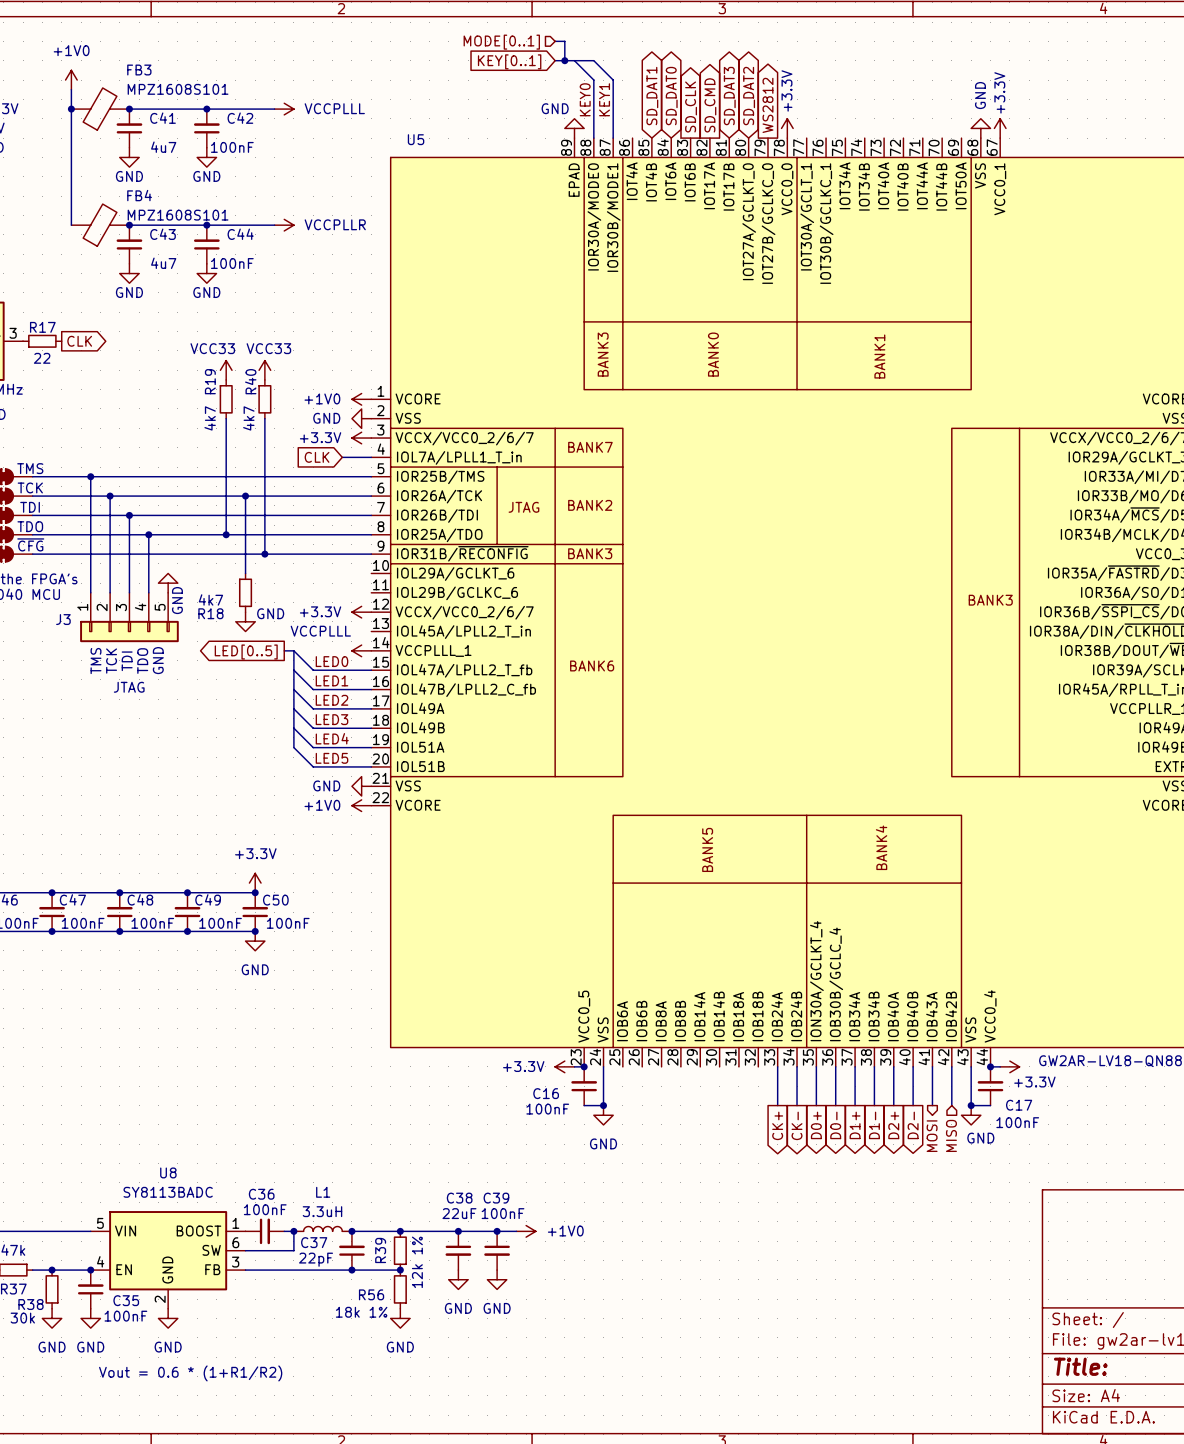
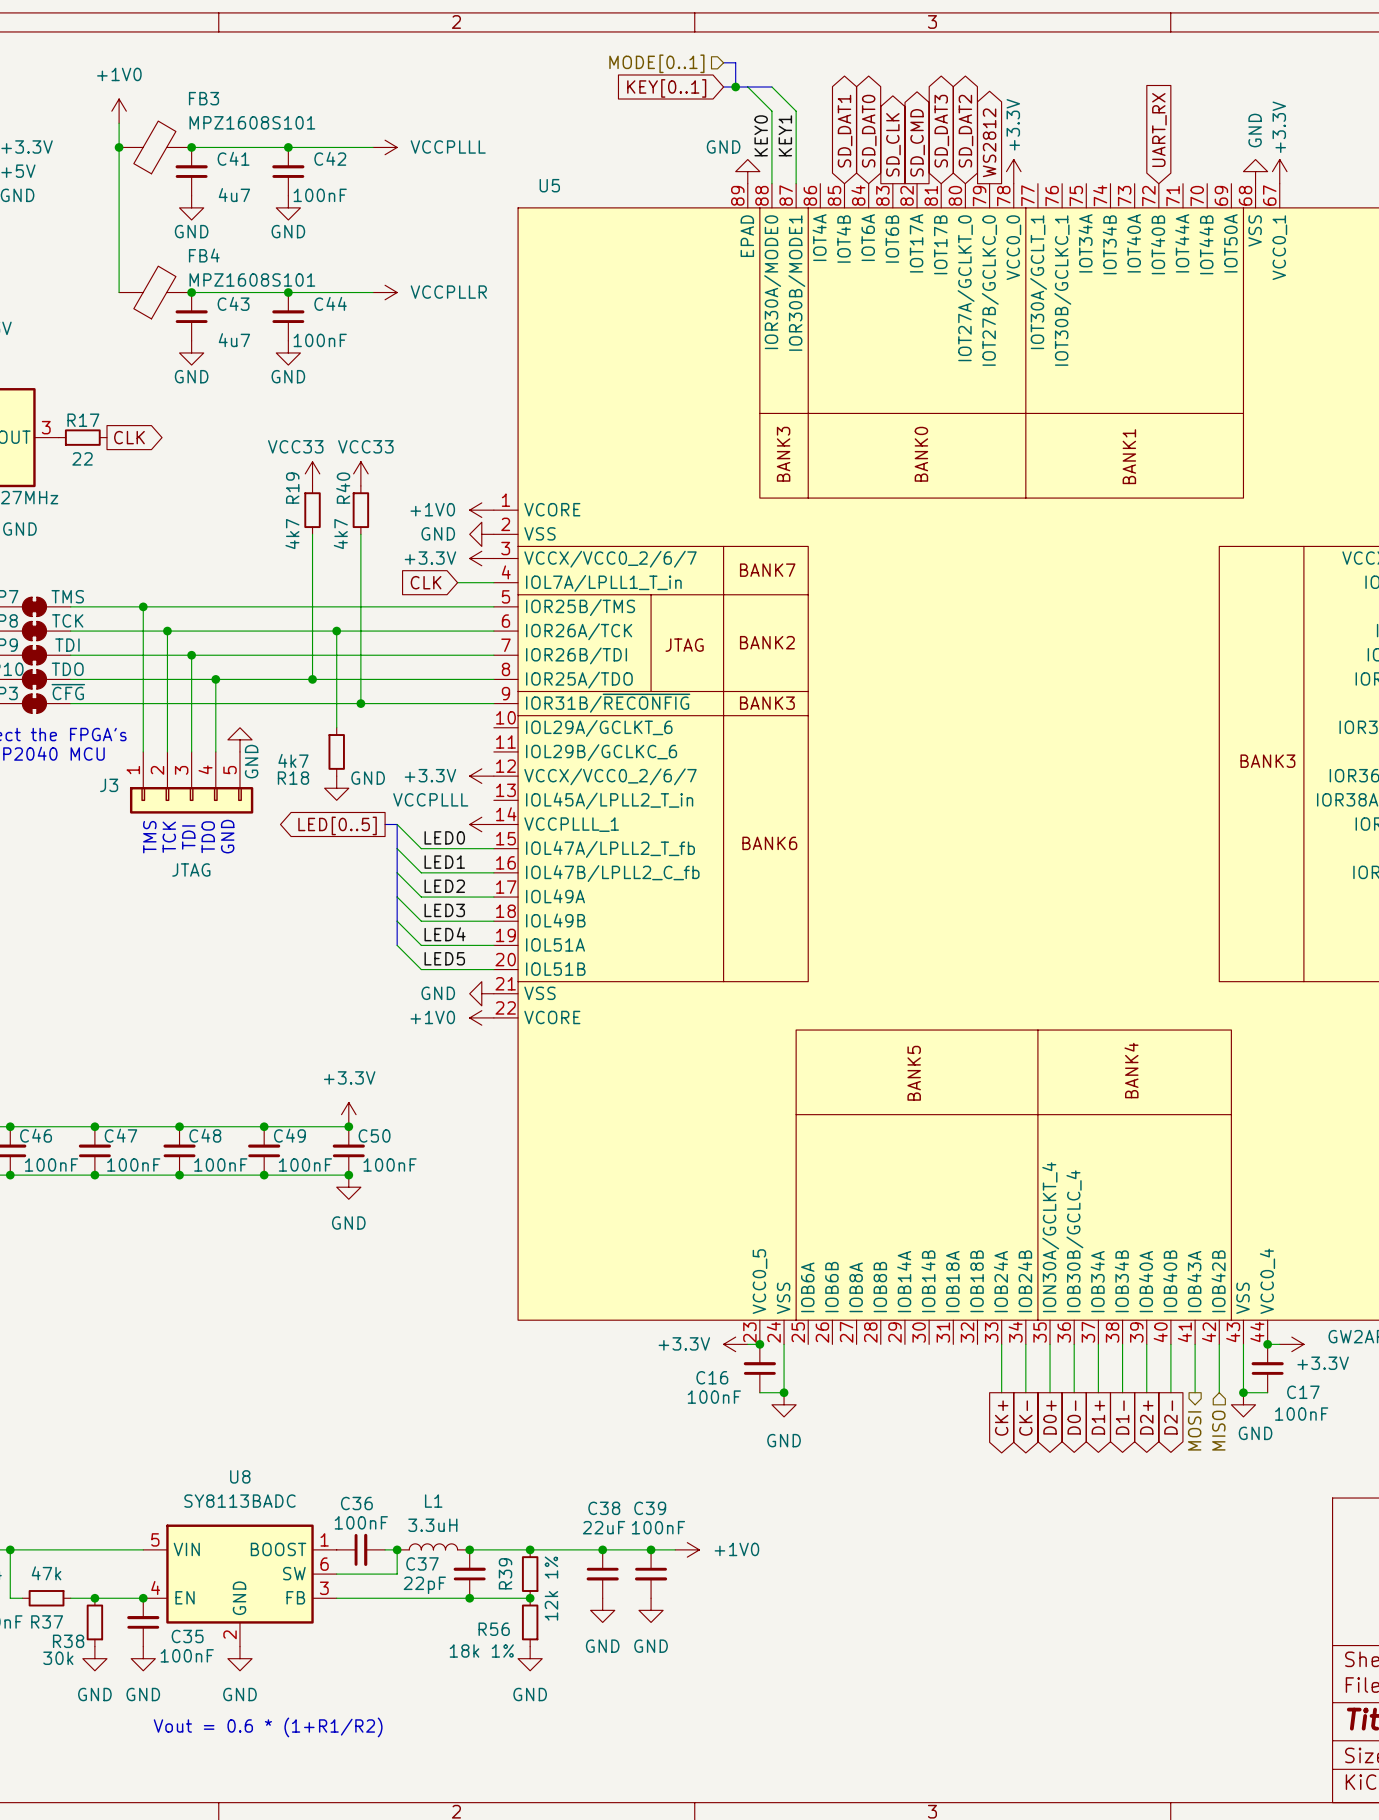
global label: none -> UART_RX (1159, 130)

